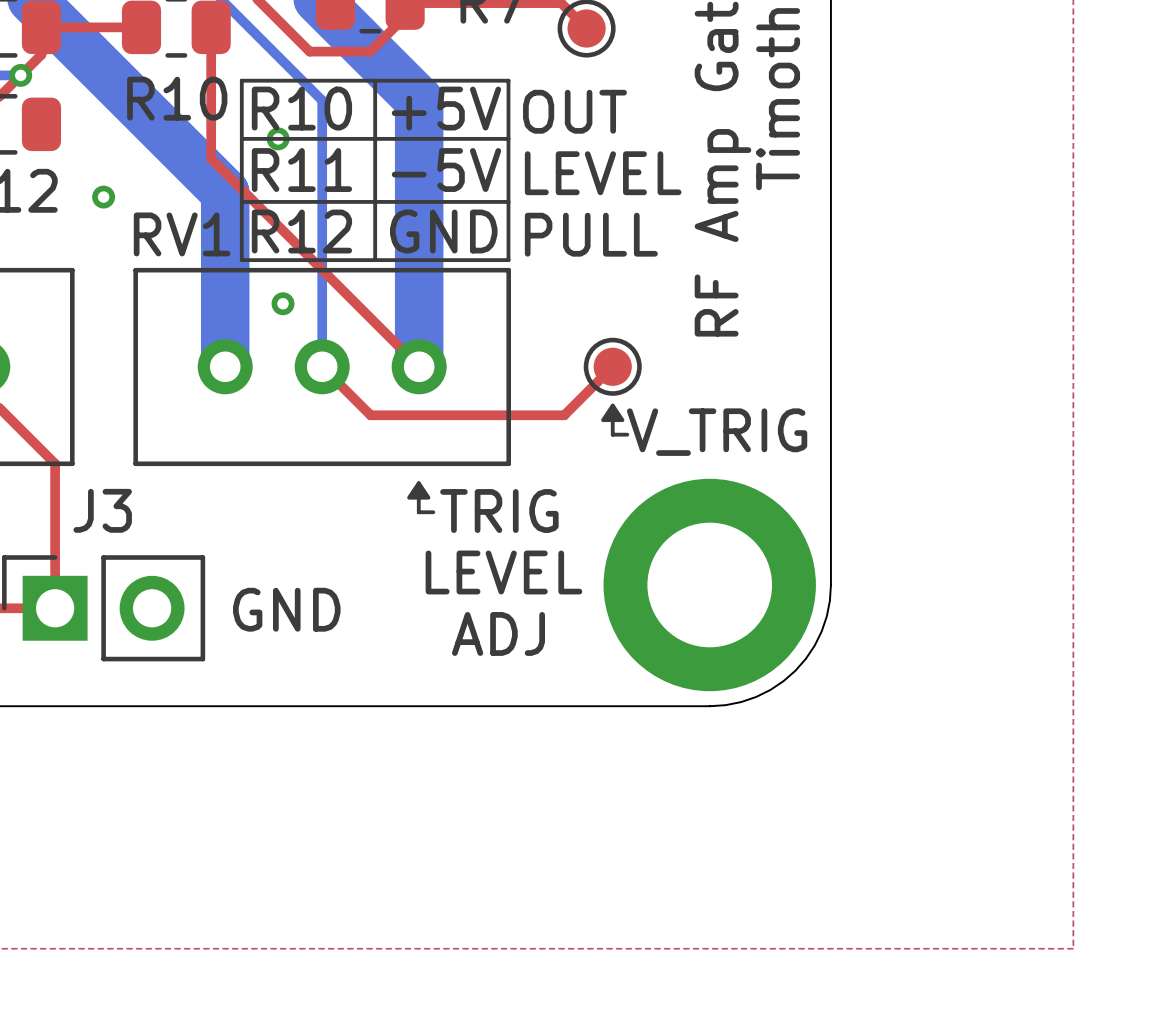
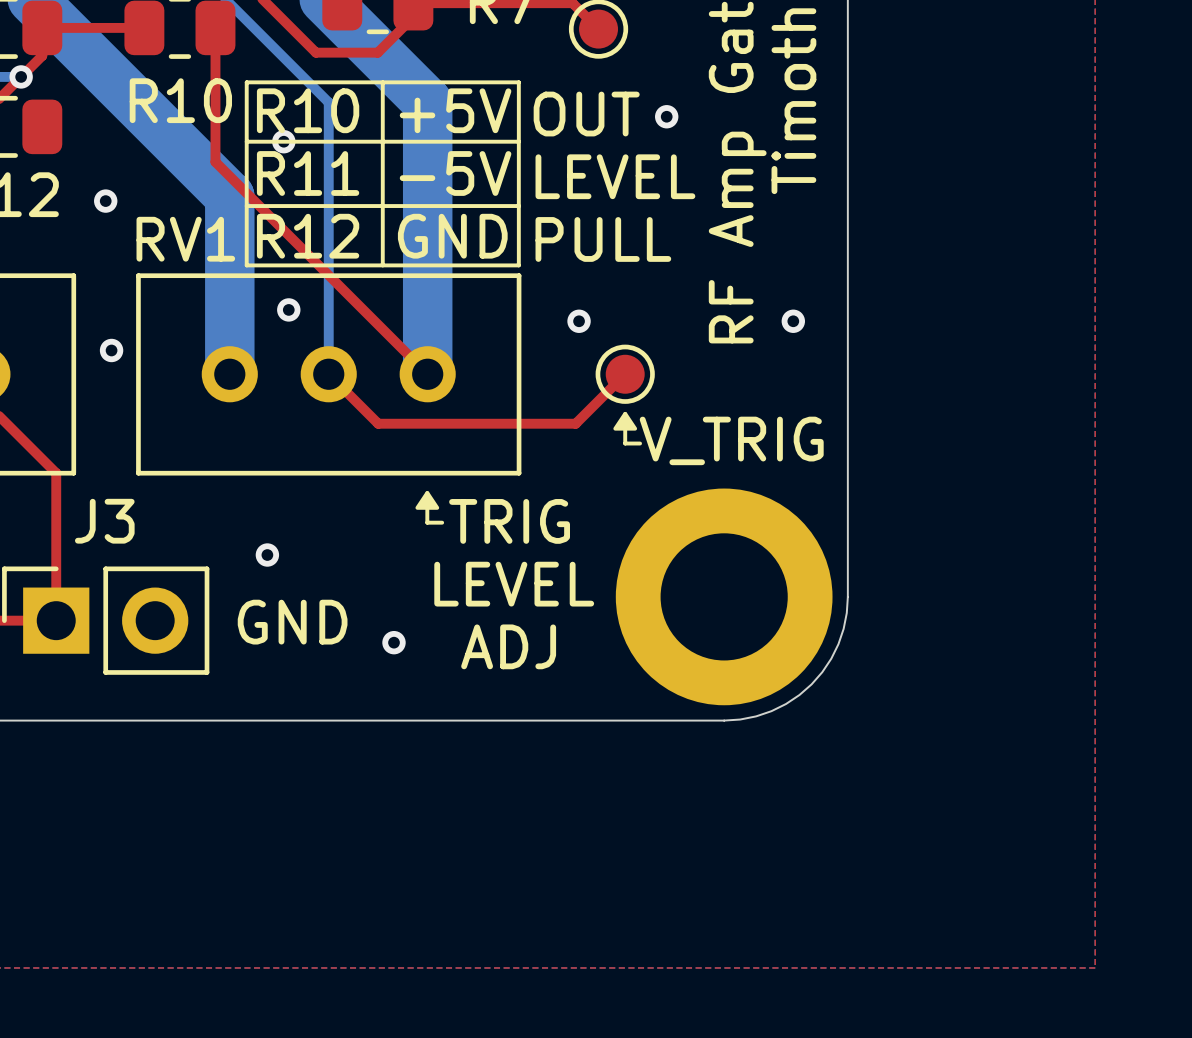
via: none -> (666, 116)
via: none -> (579, 321)
via: none -> (793, 321)
via: none -> (111, 350)
via: none -> (267, 555)
via: none -> (394, 642)

